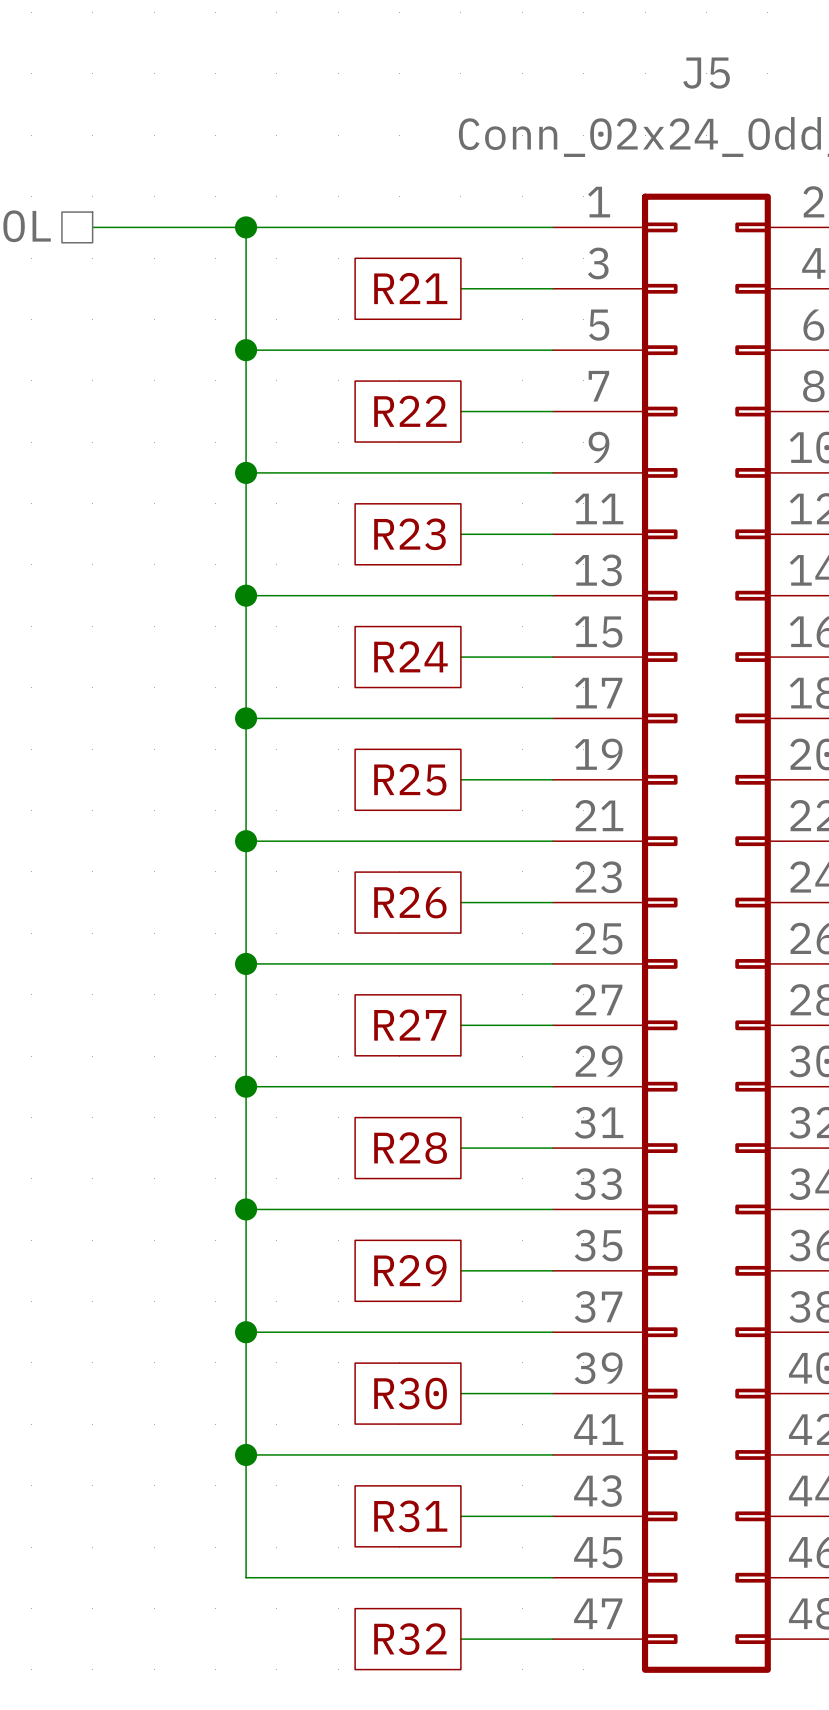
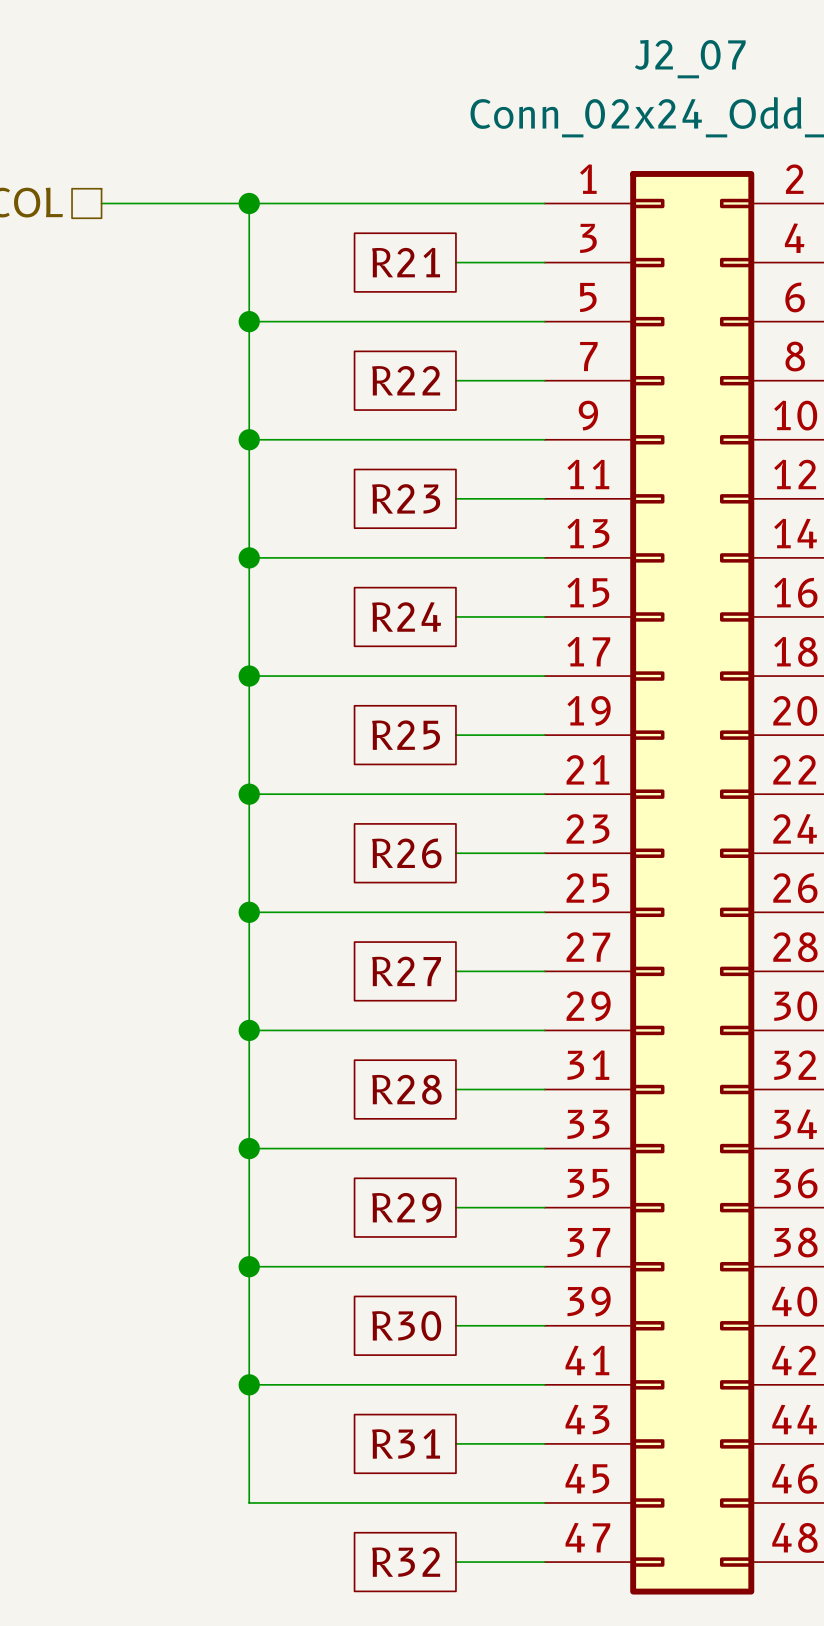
J5 name: J5 (706, 73) -> J2_07 (690, 59)

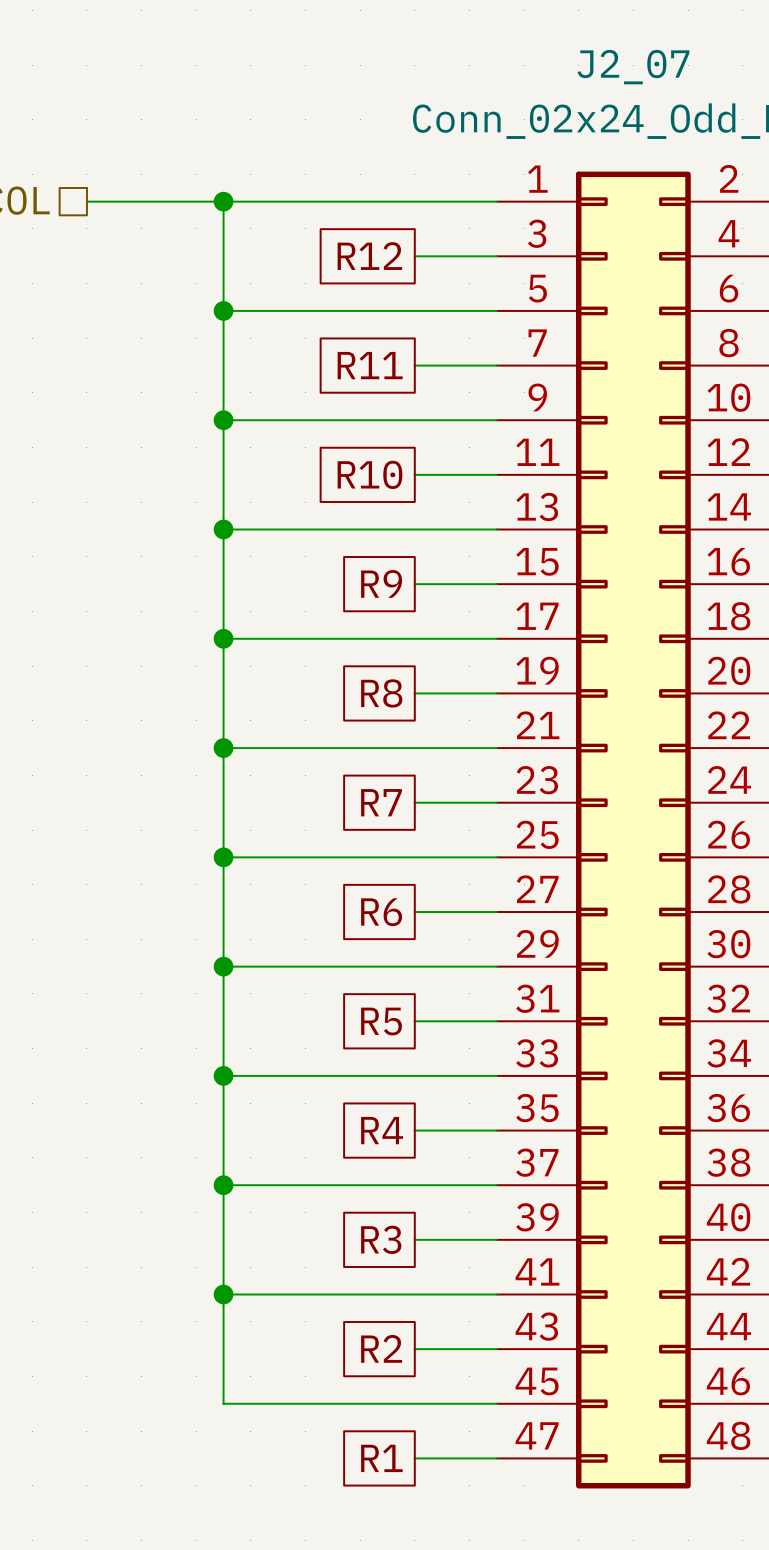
global label: R21 (406, 262) -> R12 (369, 256)
global label: R22 (406, 380) -> R11 (370, 365)
global label: R23 (406, 498) -> R10 (370, 474)
global label: R24 (406, 616) -> R9 (381, 583)
global label: R25 (406, 735) -> R8 (381, 693)
global label: R26 (406, 853) -> R7 (381, 802)
global label: R27 (406, 971) -> R6 (381, 912)
global label: R28 (406, 1089) -> R5 (381, 1021)
global label: R29 (406, 1207) -> R4 (382, 1130)
global label: R30 (406, 1325) -> R3 (381, 1239)
global label: R31 (406, 1443) -> R2 (381, 1348)
global label: R32 (406, 1562) -> R1 (381, 1458)

